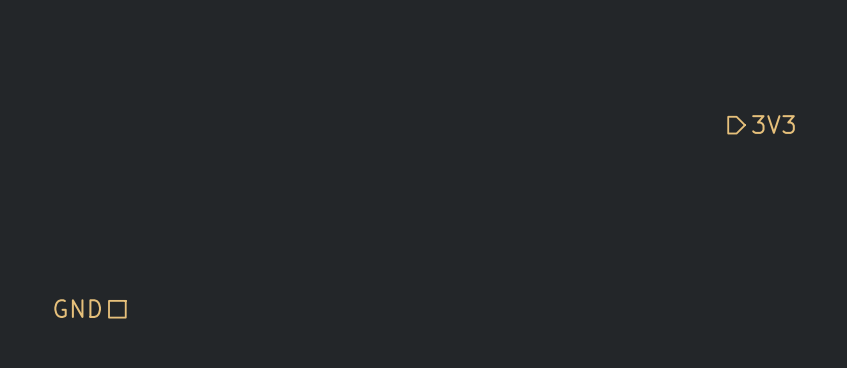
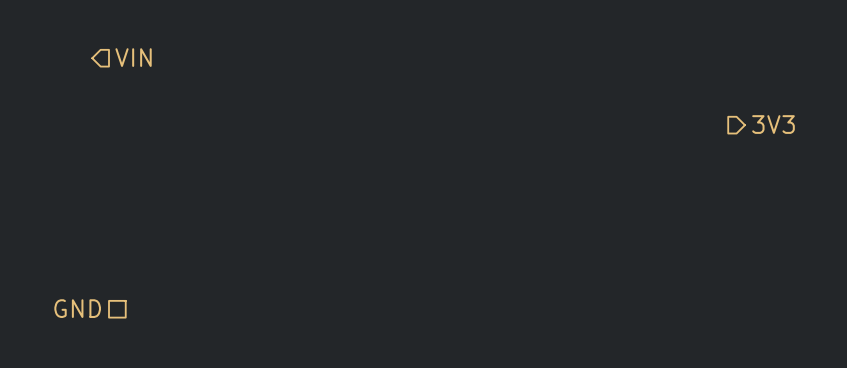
hierarchical label: none -> VIN (133, 57)

